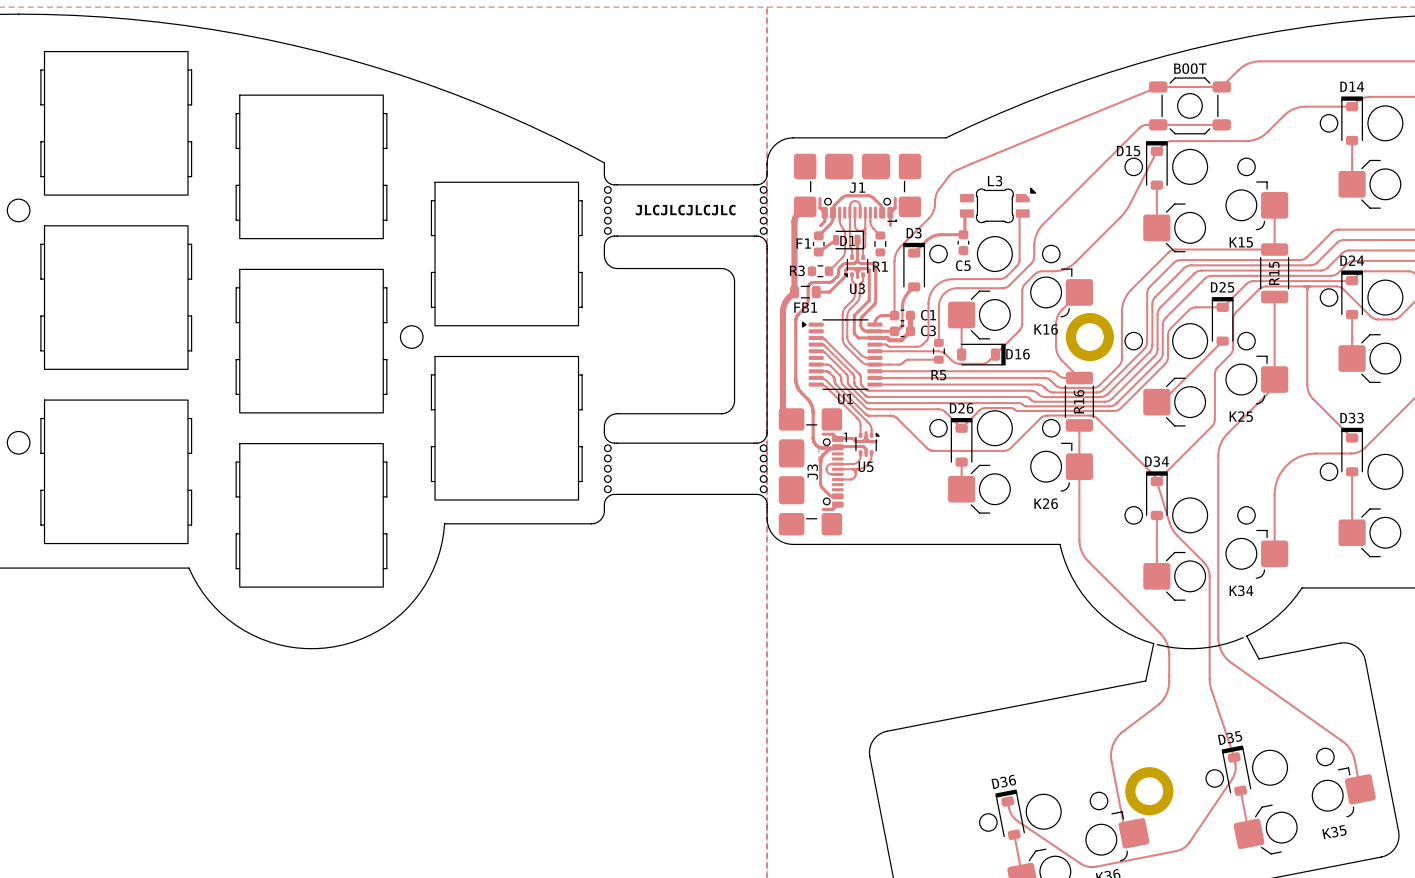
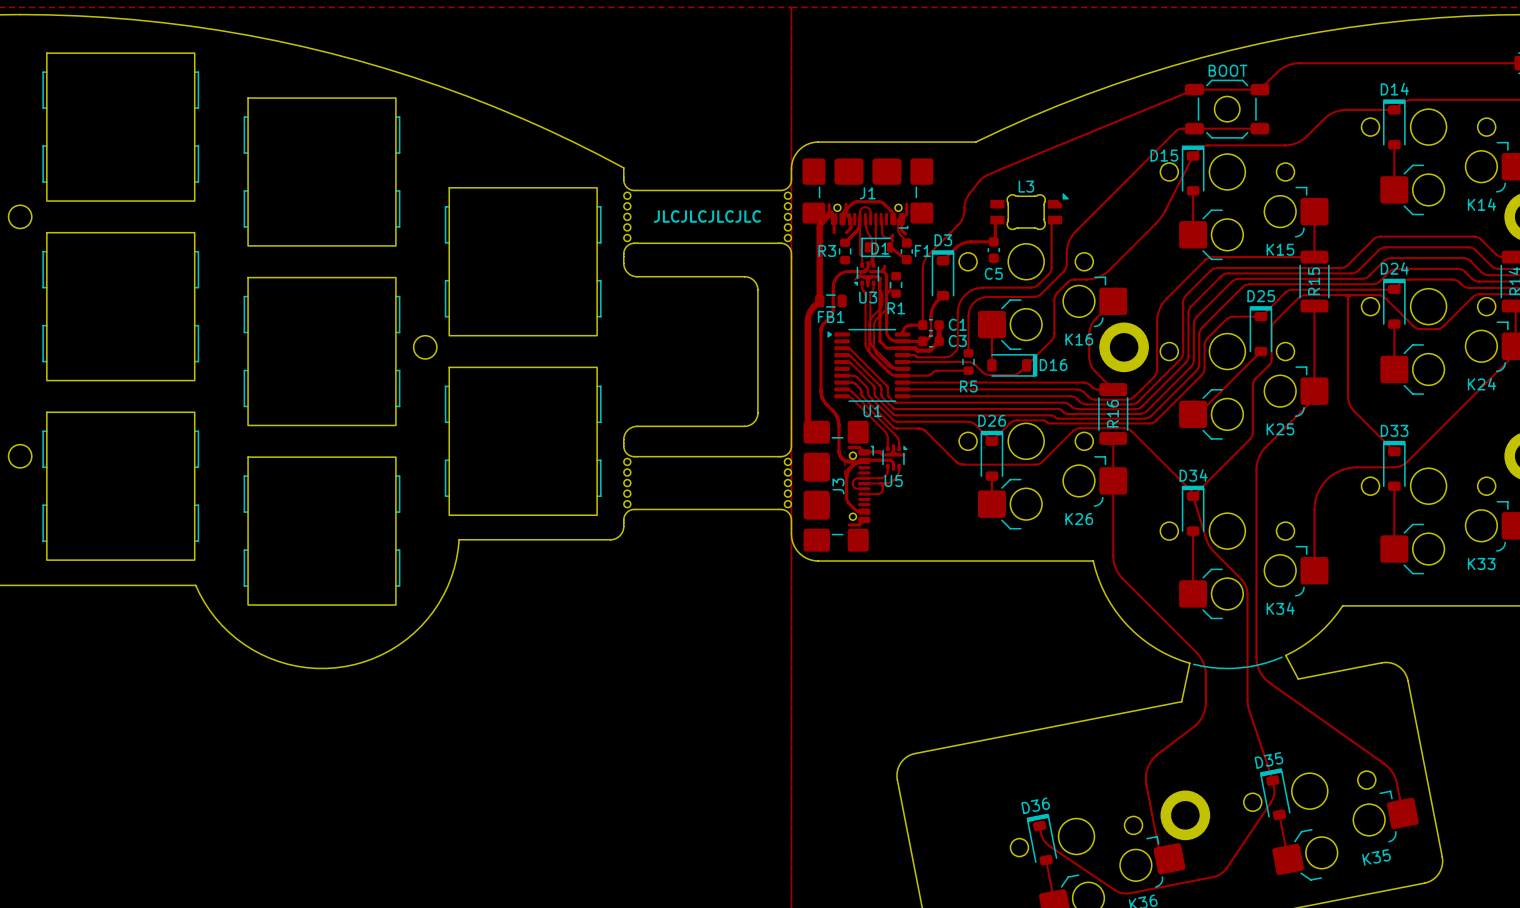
J1 position: (857, 187) -> (867, 193)
top track: (847, 195) (842, 197) (834, 205) (832, 210) -> (874, 201) (854, 202) (843, 212) (842, 217)
top track: (851, 195) (870, 196) (881, 205) (882, 210) -> (878, 201) (884, 204) (892, 211) (893, 217)
top track: none -> (829, 204) (829, 214) (834, 219) (834, 232)
top track: none -> (906, 204) (906, 214) (901, 219) (901, 230) (905, 233)
top track: (895, 198) (895, 207) (890, 212) (890, 225) -> none
top track: (865, 212) (865, 245) (863, 249) (863, 257) -> (875, 219) (875, 253) (873, 256) (873, 265)
top track: (860, 216) (859, 203) (856, 201) (852, 201) (849, 206) (849, 246) (852, 249) (852, 257) -> (870, 223) (869, 209) (866, 207) (862, 207) (860, 212) (860, 253) (862, 256) (862, 265)
top track: (836, 240) (818, 252) -> none
D1 rotation: 0° (848, 240) -> 180° (877, 247)
top track: (857, 240) (857, 261) (861, 263) (872, 263) (875, 267) (875, 302) (860, 319) (861, 328) (869, 331) -> (881, 271) (886, 276) (886, 333) (890, 339) (897, 341)
top track: none -> (890, 247) (906, 259)
F1 name position: F1 (803, 243) -> F1 (922, 250)
F1 position: (818, 243) -> (906, 251)
R1 position: (880, 243) -> (896, 284)
top track: (845, 263) (839, 267) (838, 275) (831, 281) (809, 284) (807, 302) (804, 307) -> (867, 269) (865, 271) (844, 272) (836, 277) (833, 285) (833, 311) (830, 317)
U3 position: (856, 266) -> (866, 274)
top track: (847, 268) (845, 275) (829, 292) (816, 292) -> none
top track: (867, 268) (869, 300) (854, 315) (854, 333) (859, 337) -> (878, 276) (879, 341) (886, 348)
R3 rotation: 0° (820, 271) -> 90° clockwise (845, 251)
R3 position: (820, 271) -> (845, 251)
top track: none -> (862, 283) (862, 289) (865, 294) (866, 347) (890, 373) (897, 375)
top track: none -> (873, 283) (873, 289) (870, 295) (870, 343) (891, 365) (899, 368)

